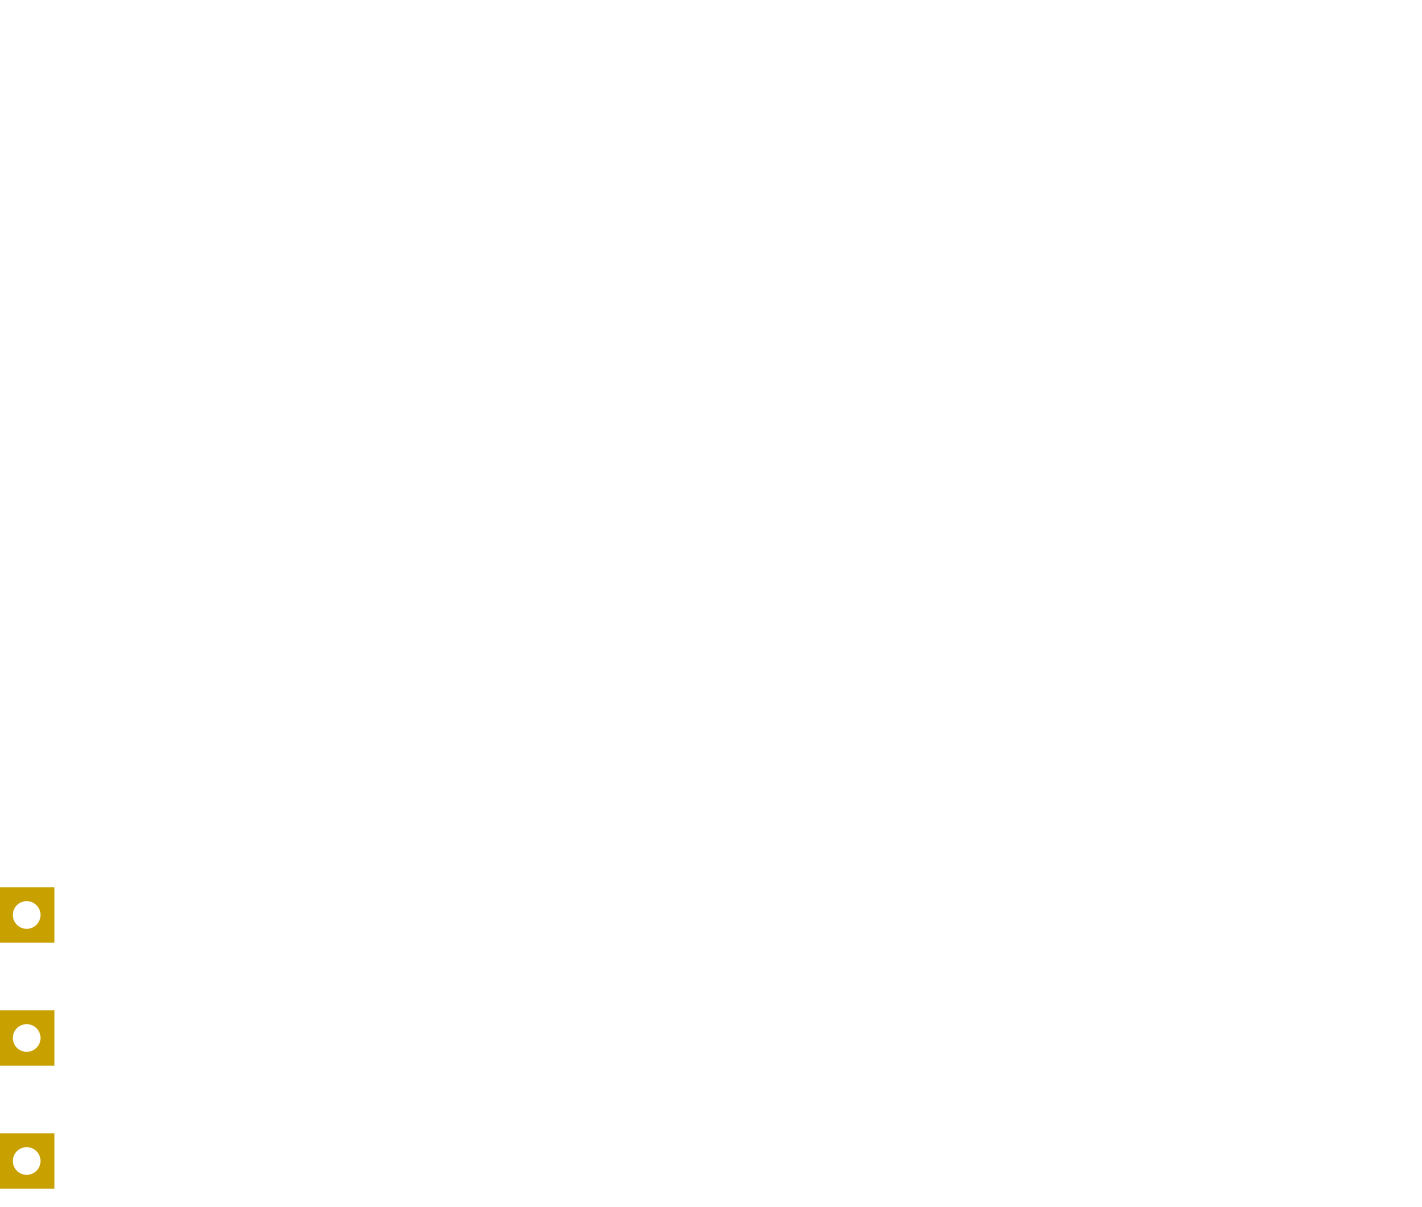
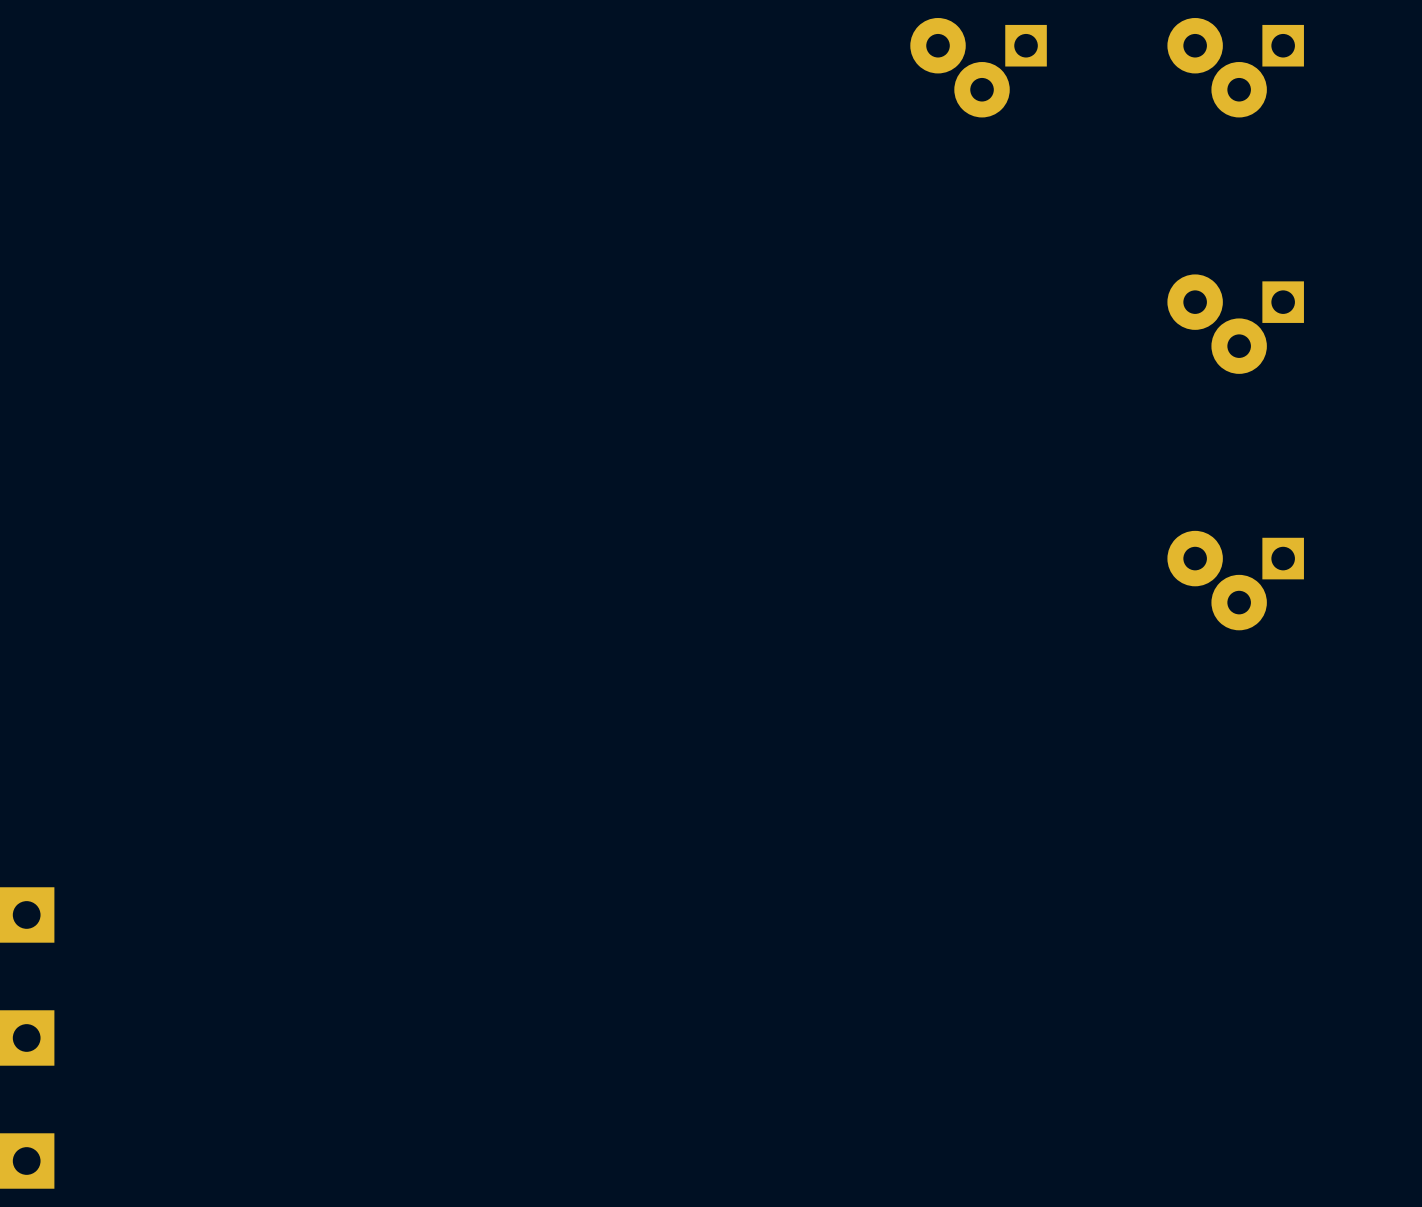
part: none -> (978, 67)
part: none -> (1235, 67)
part: none -> (1235, 324)
part: none -> (1235, 580)

